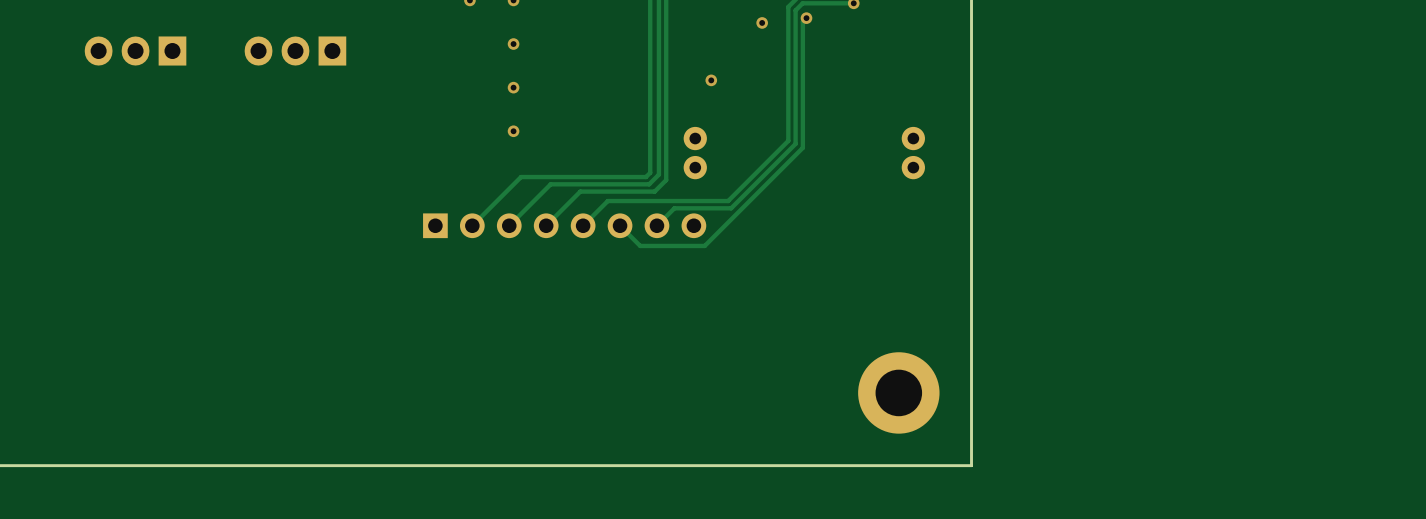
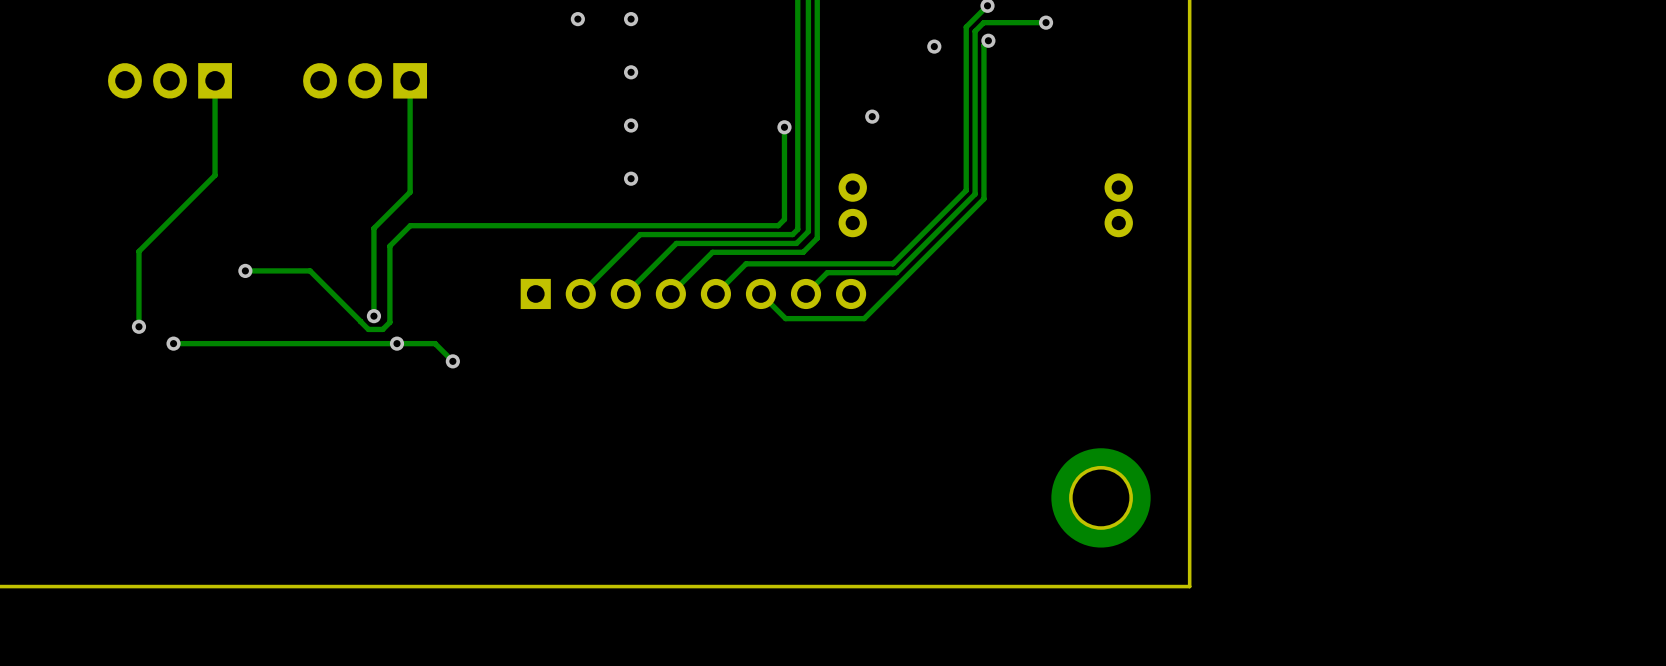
track: none -> (215, 80) (215, 175) (138, 251) (138, 326)
track: none -> (410, 80) (410, 192) (373, 228) (373, 316)
track: none -> (784, 127) (784, 219) (778, 225) (410, 225) (389, 246) (389, 322) (382, 329) (368, 329) (360, 321)
via: none -> (784, 127)
track: none -> (245, 270) (310, 270) (360, 321)
via: none -> (245, 270)
via: none -> (373, 316)
via: none -> (138, 326)
track: none -> (173, 343) (435, 343) (452, 361)
via: none -> (173, 343)
via: none -> (396, 343)
via: none -> (452, 361)

